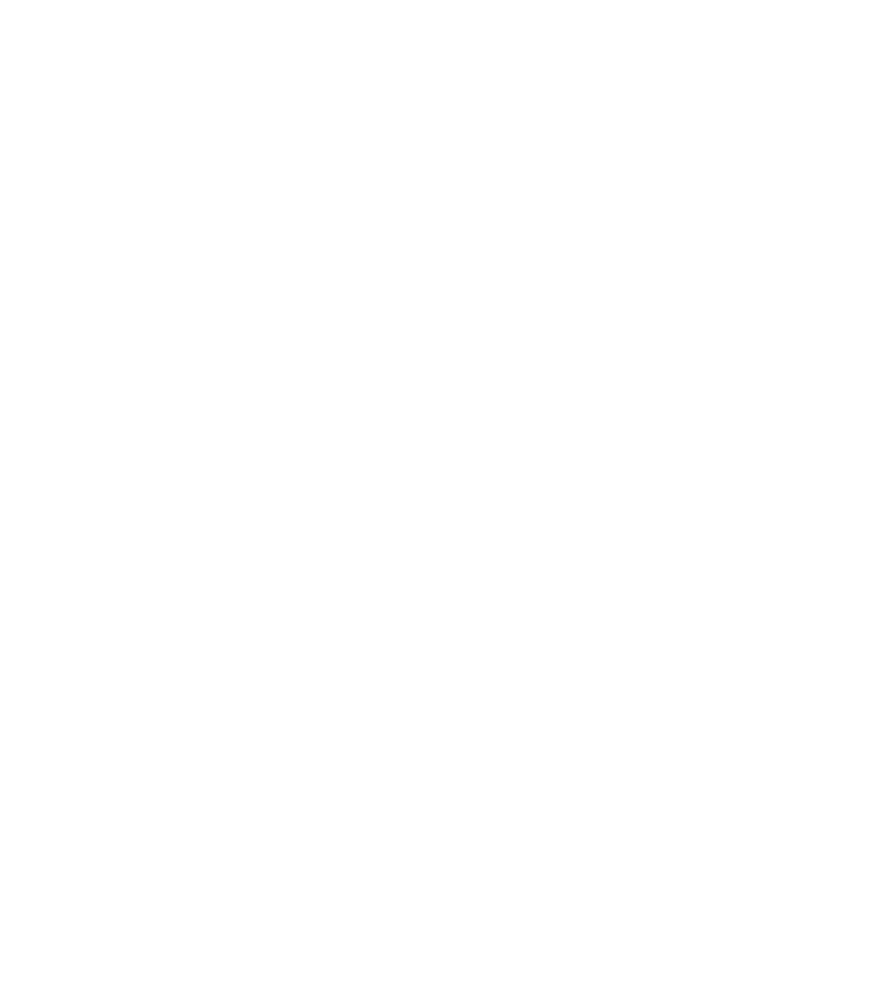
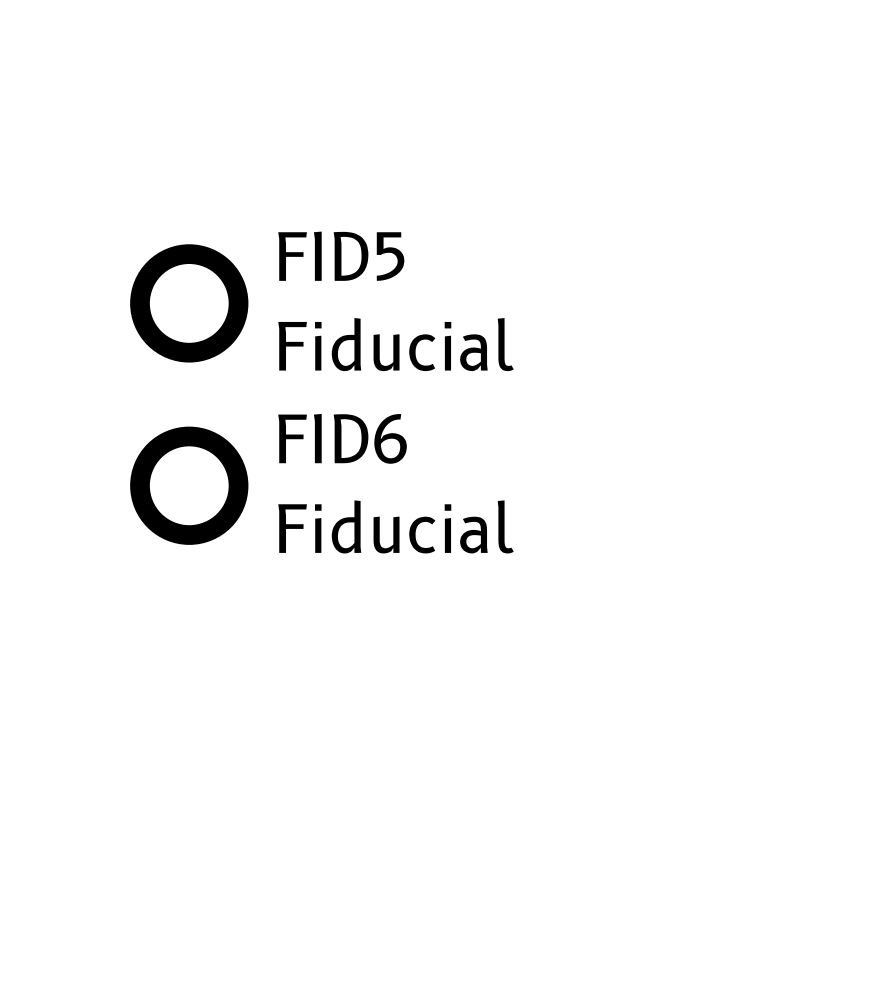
FID5: none -> Fiducial (189, 303)
FID6: none -> Fiducial (189, 485)

